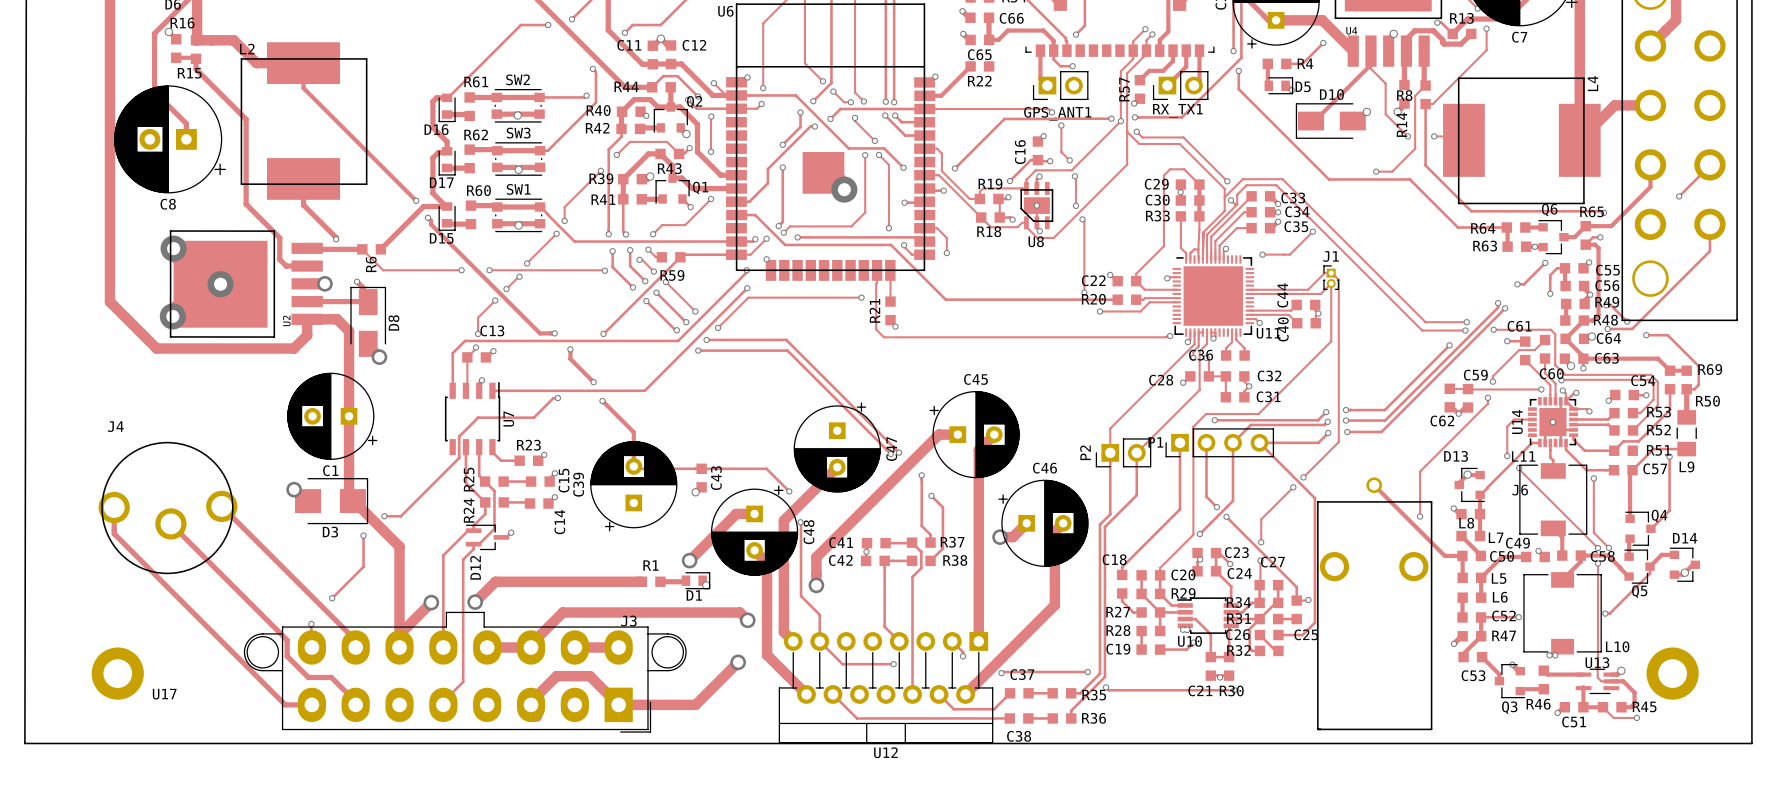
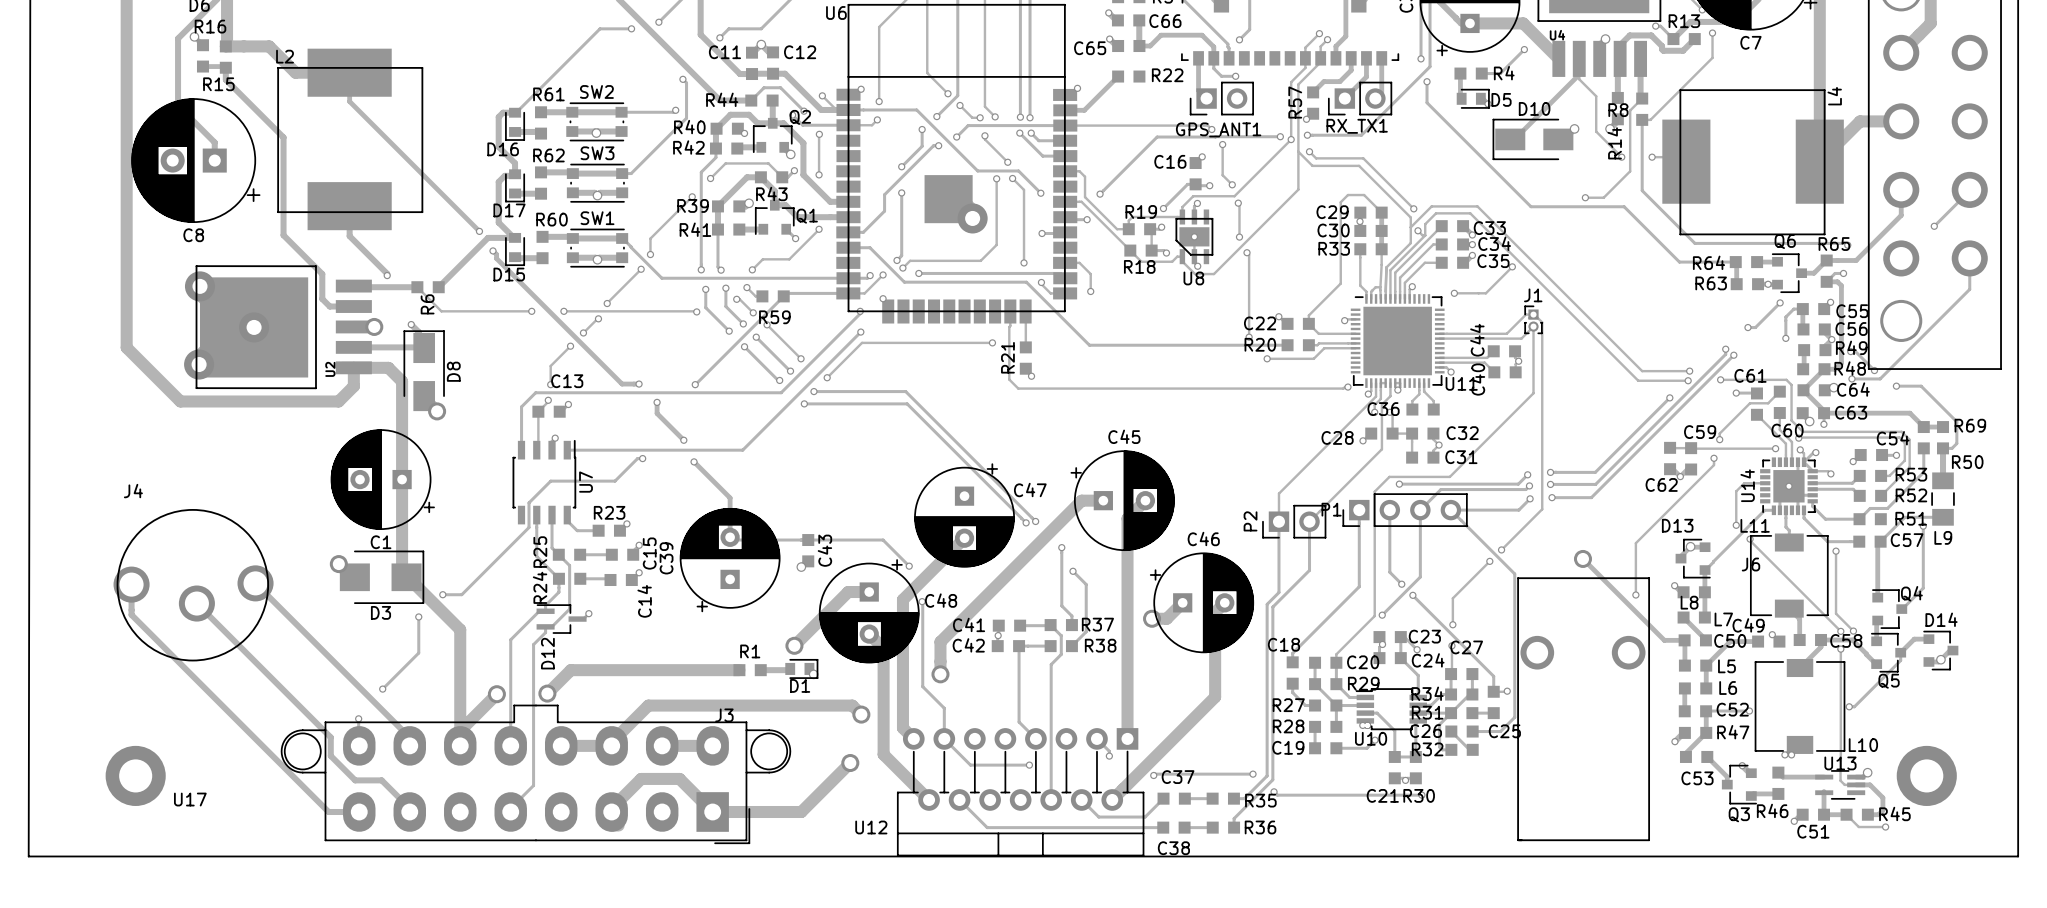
C65 name position: C65 (979, 54) -> C65 (1090, 48)
R22 name position: R22 (979, 81) -> R22 (1167, 75)
C16 name rotation: 0° (1020, 152) -> 90° clockwise (1170, 161)
C47 name rotation: 0° (891, 449) -> 90° clockwise (1030, 490)
C48 name rotation: 0° (808, 532) -> 90° clockwise (941, 600)
U12 name position: U12 (885, 752) -> U12 (871, 827)

